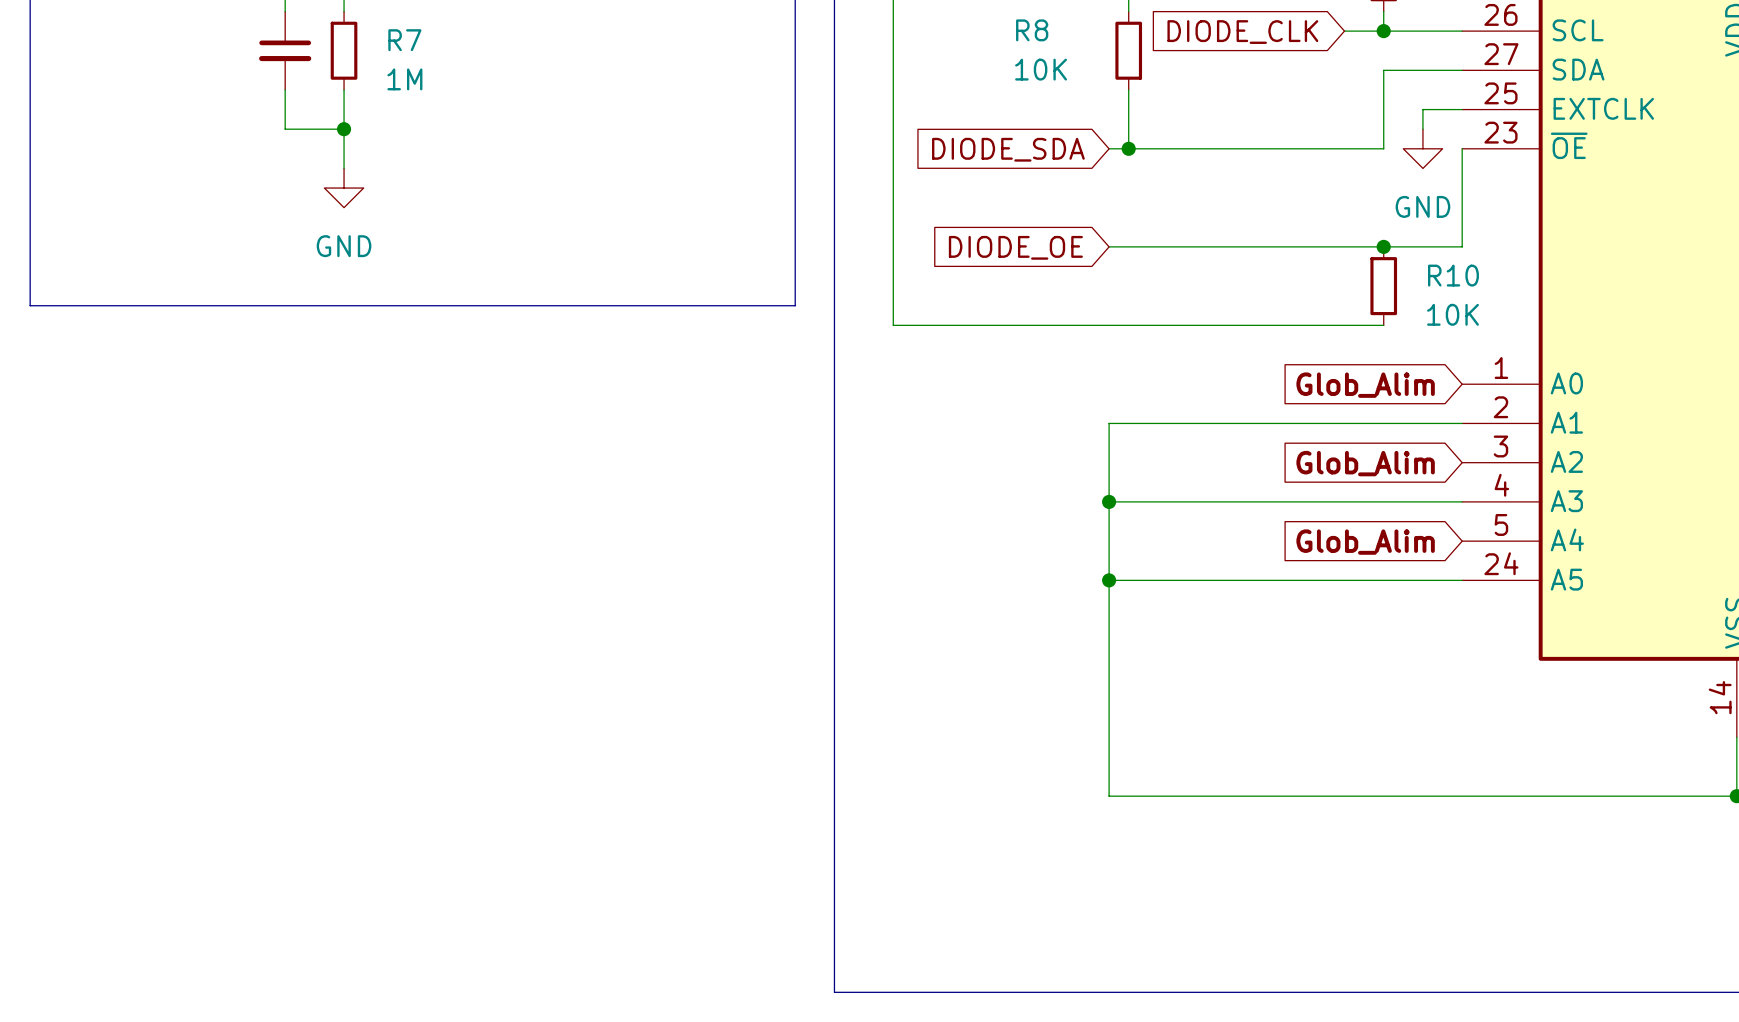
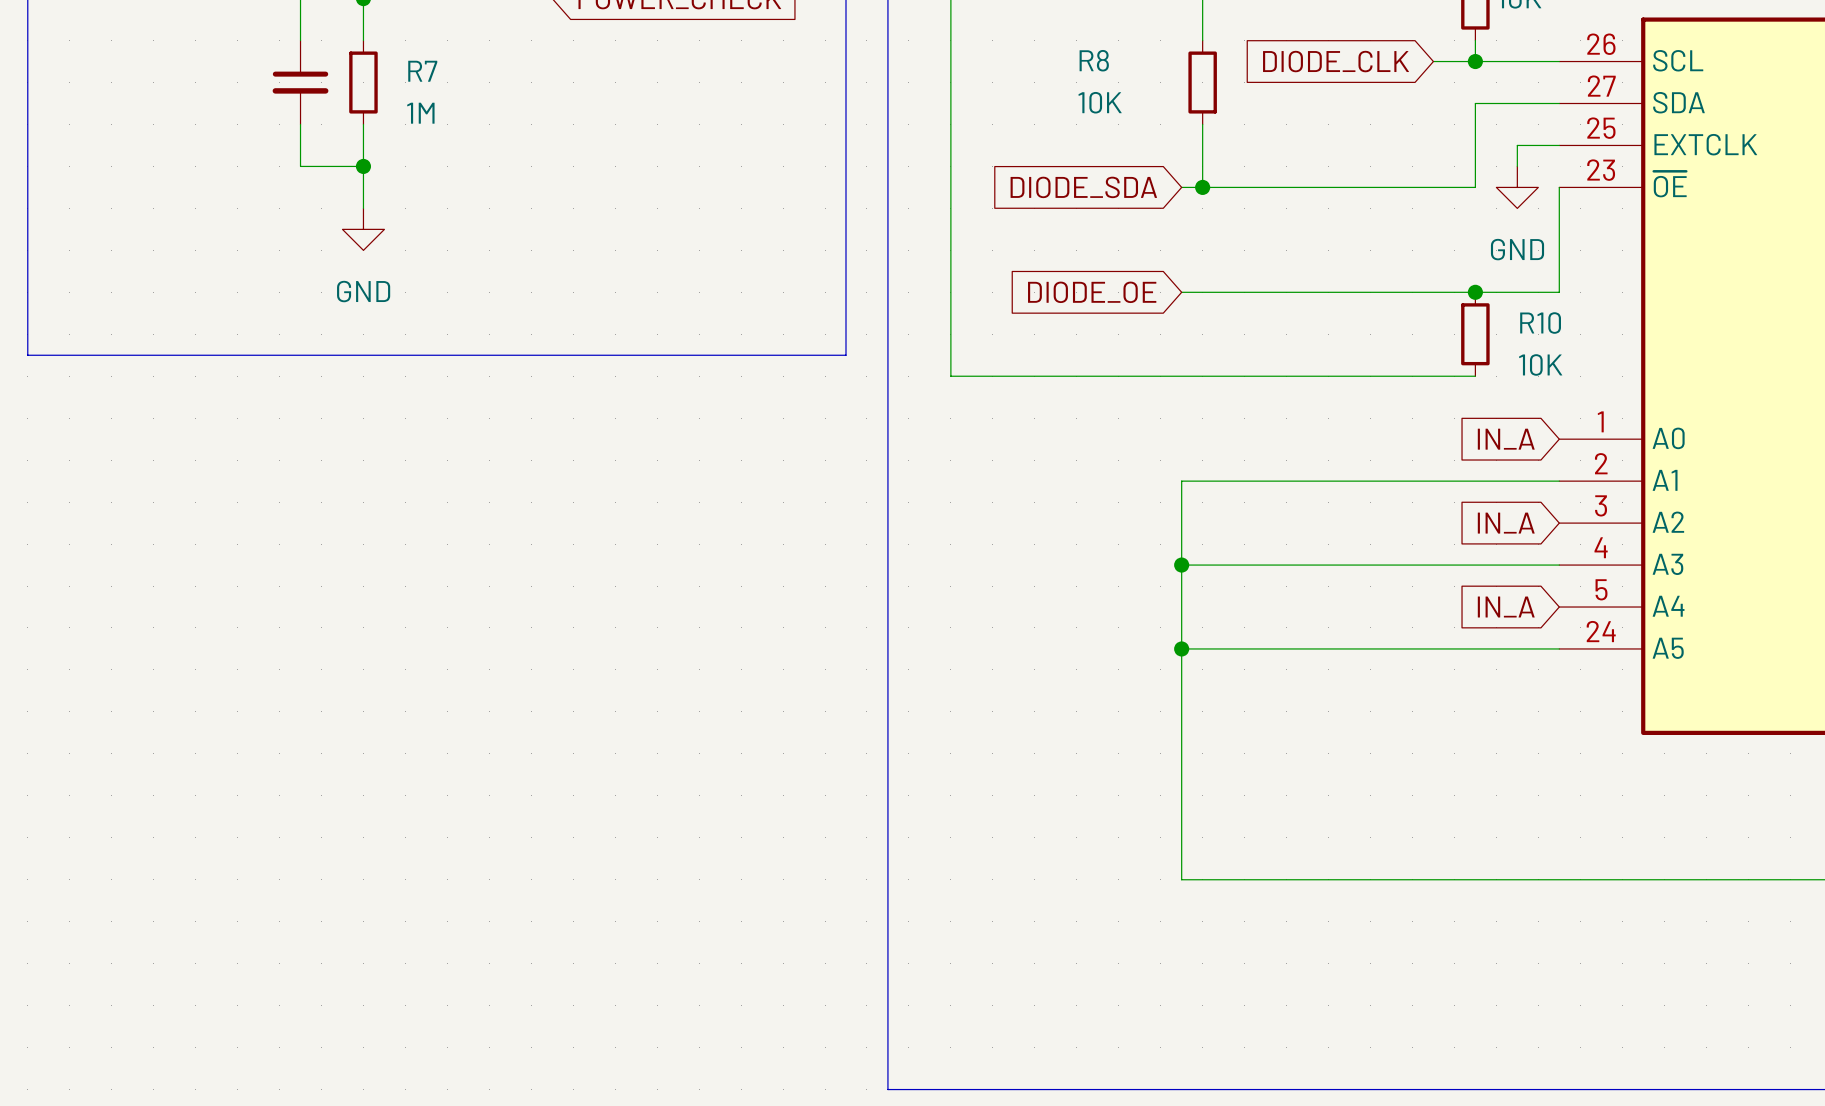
global label: Glob_Alim (1365, 385) -> IN_A (1506, 439)
global label: Glob_Alim (1365, 463) -> IN_A (1506, 523)
global label: Glob_Alim (1365, 542) -> IN_A (1506, 607)

